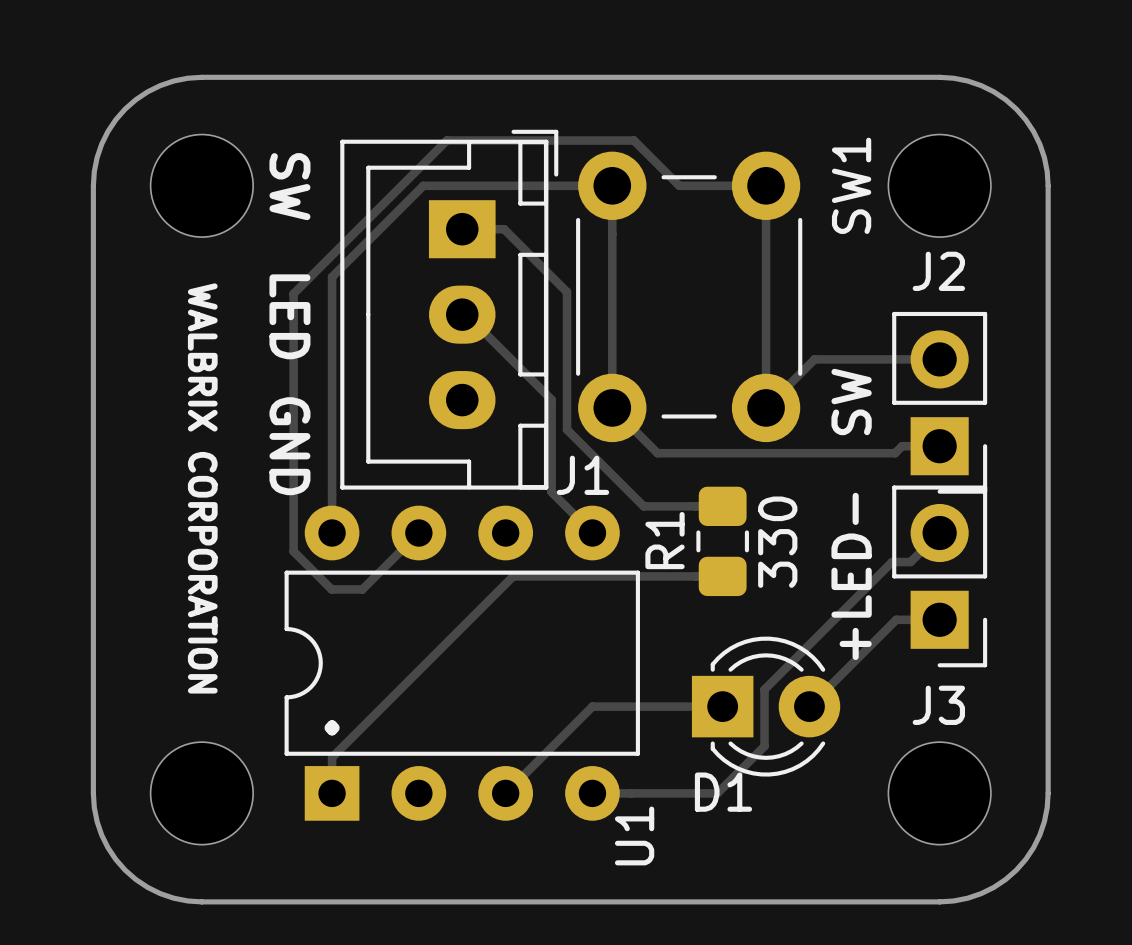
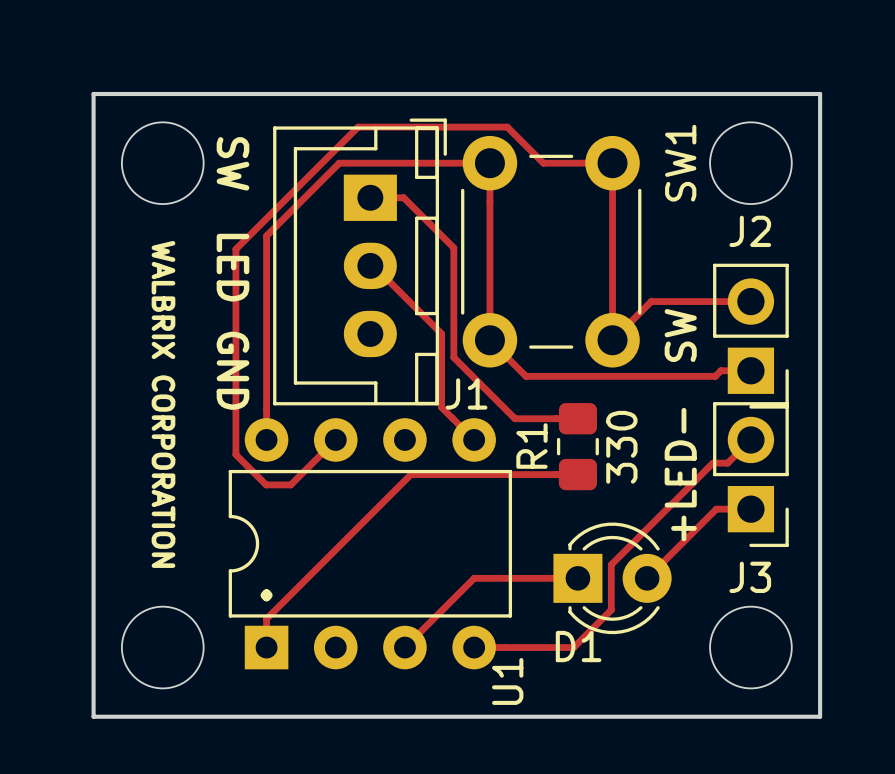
board edge: (201, 77) (939, 77) (967, 81) (981, 85) (1005, 99) (1016, 109) (1033, 131) (1039, 144) (1044, 157) (1048, 185) (1048, 793) (1044, 821) (1039, 834) (1033, 847) (1016, 870) (1005, 879) (981, 893) (967, 898) (939, 901) (201, 901) (173, 898) (160, 893) (135, 879) (125, 870) (107, 847) (101, 834) (97, 821) (93, 793) (94, 171) (101, 144) (107, 131) (115, 119) (135, 99) (147, 91) (173, 81) (201, 77) -> (93, 93) (93, 716) (820, 716) (820, 93) (93, 93)

